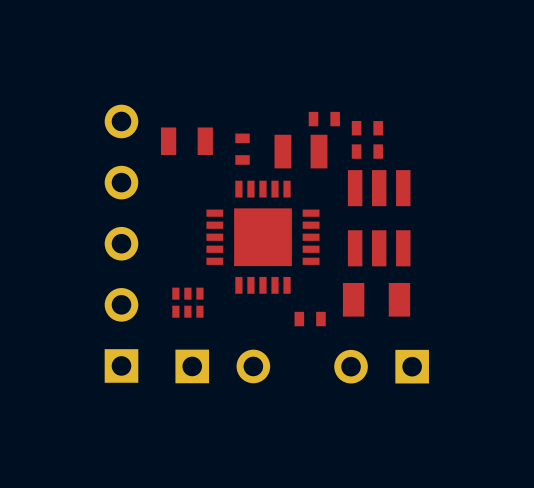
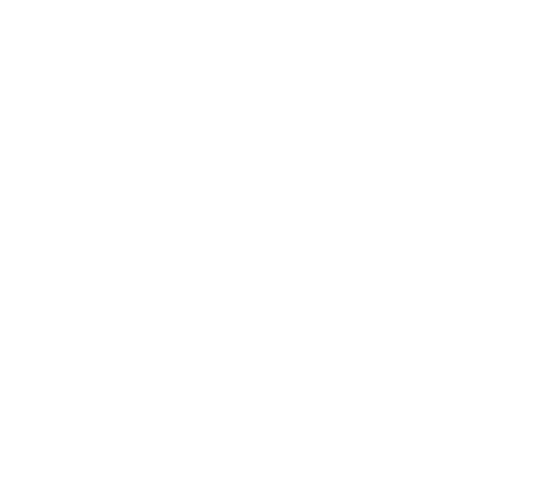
part: (324, 119) -> none
part: (367, 128) -> none
part: (186, 141) -> none
part: (242, 149) -> none
part: (300, 151) -> none
part: (367, 151) -> none
part: (379, 218) -> none
part: (262, 237) -> none
part: (121, 243) -> none
part: (376, 299) -> none
part: (187, 302) -> none
part: (310, 319) -> none
part: (222, 366) -> none
part: (381, 366) -> none

